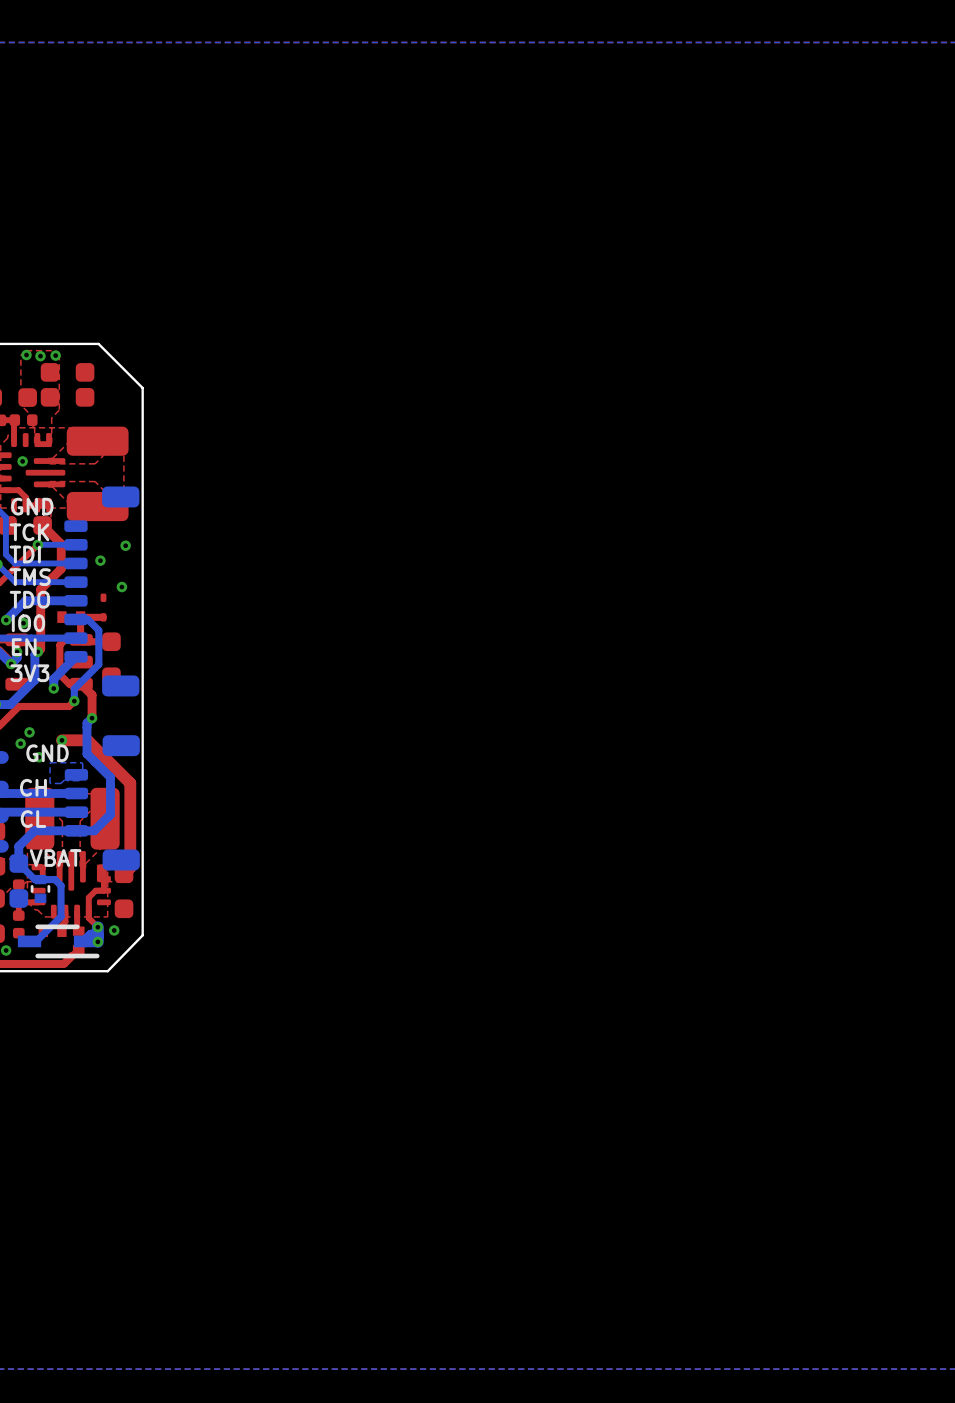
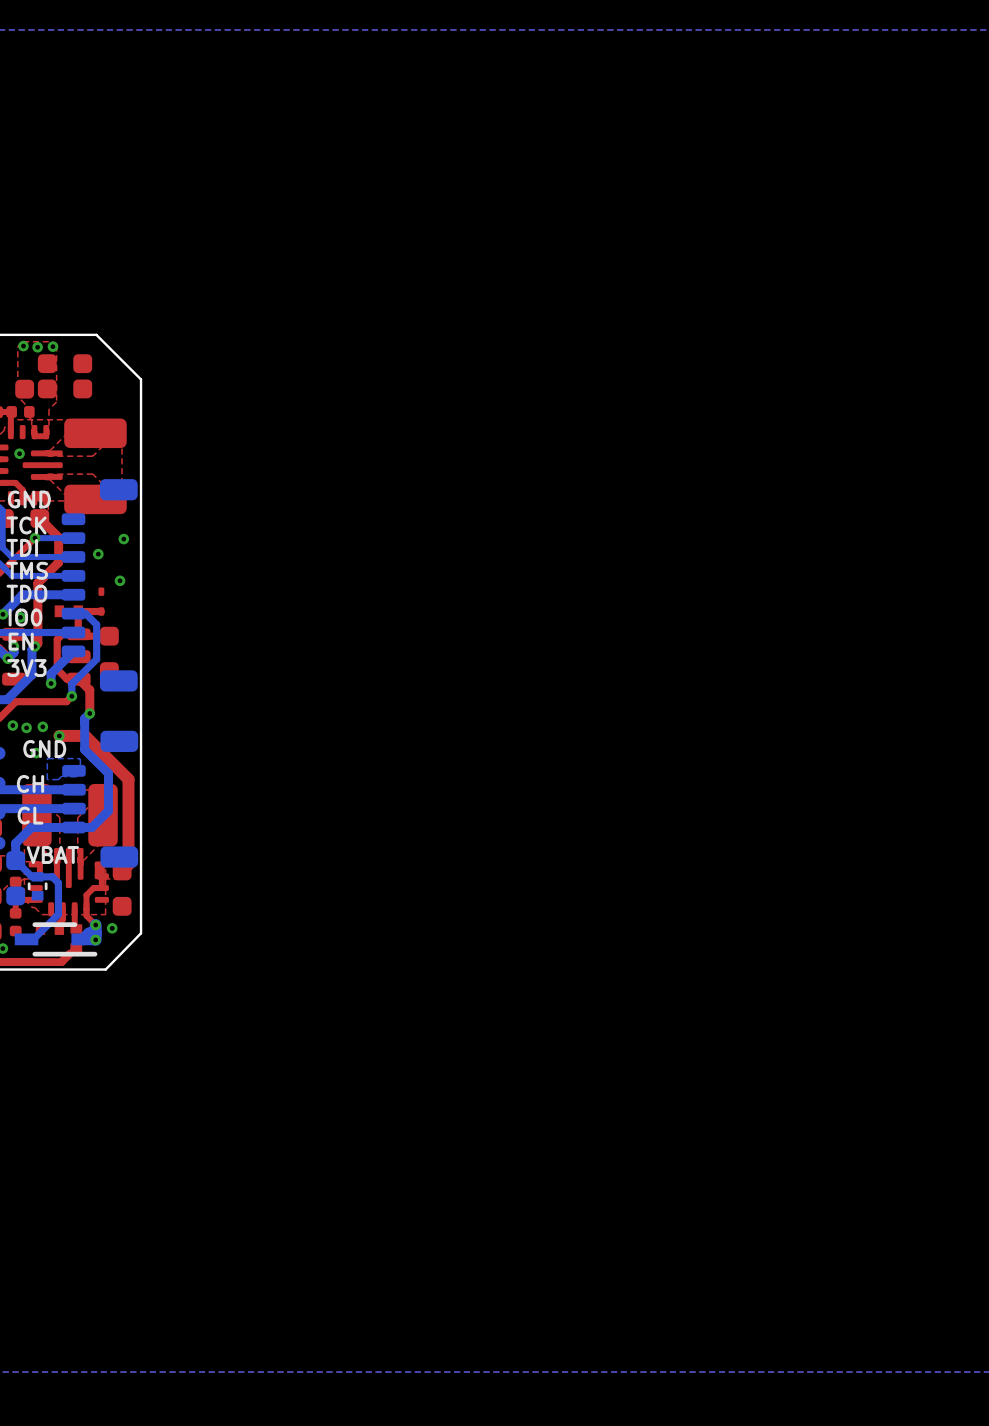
via: none -> (12, 725)
via: none -> (42, 726)
via: (20, 743) -> none

